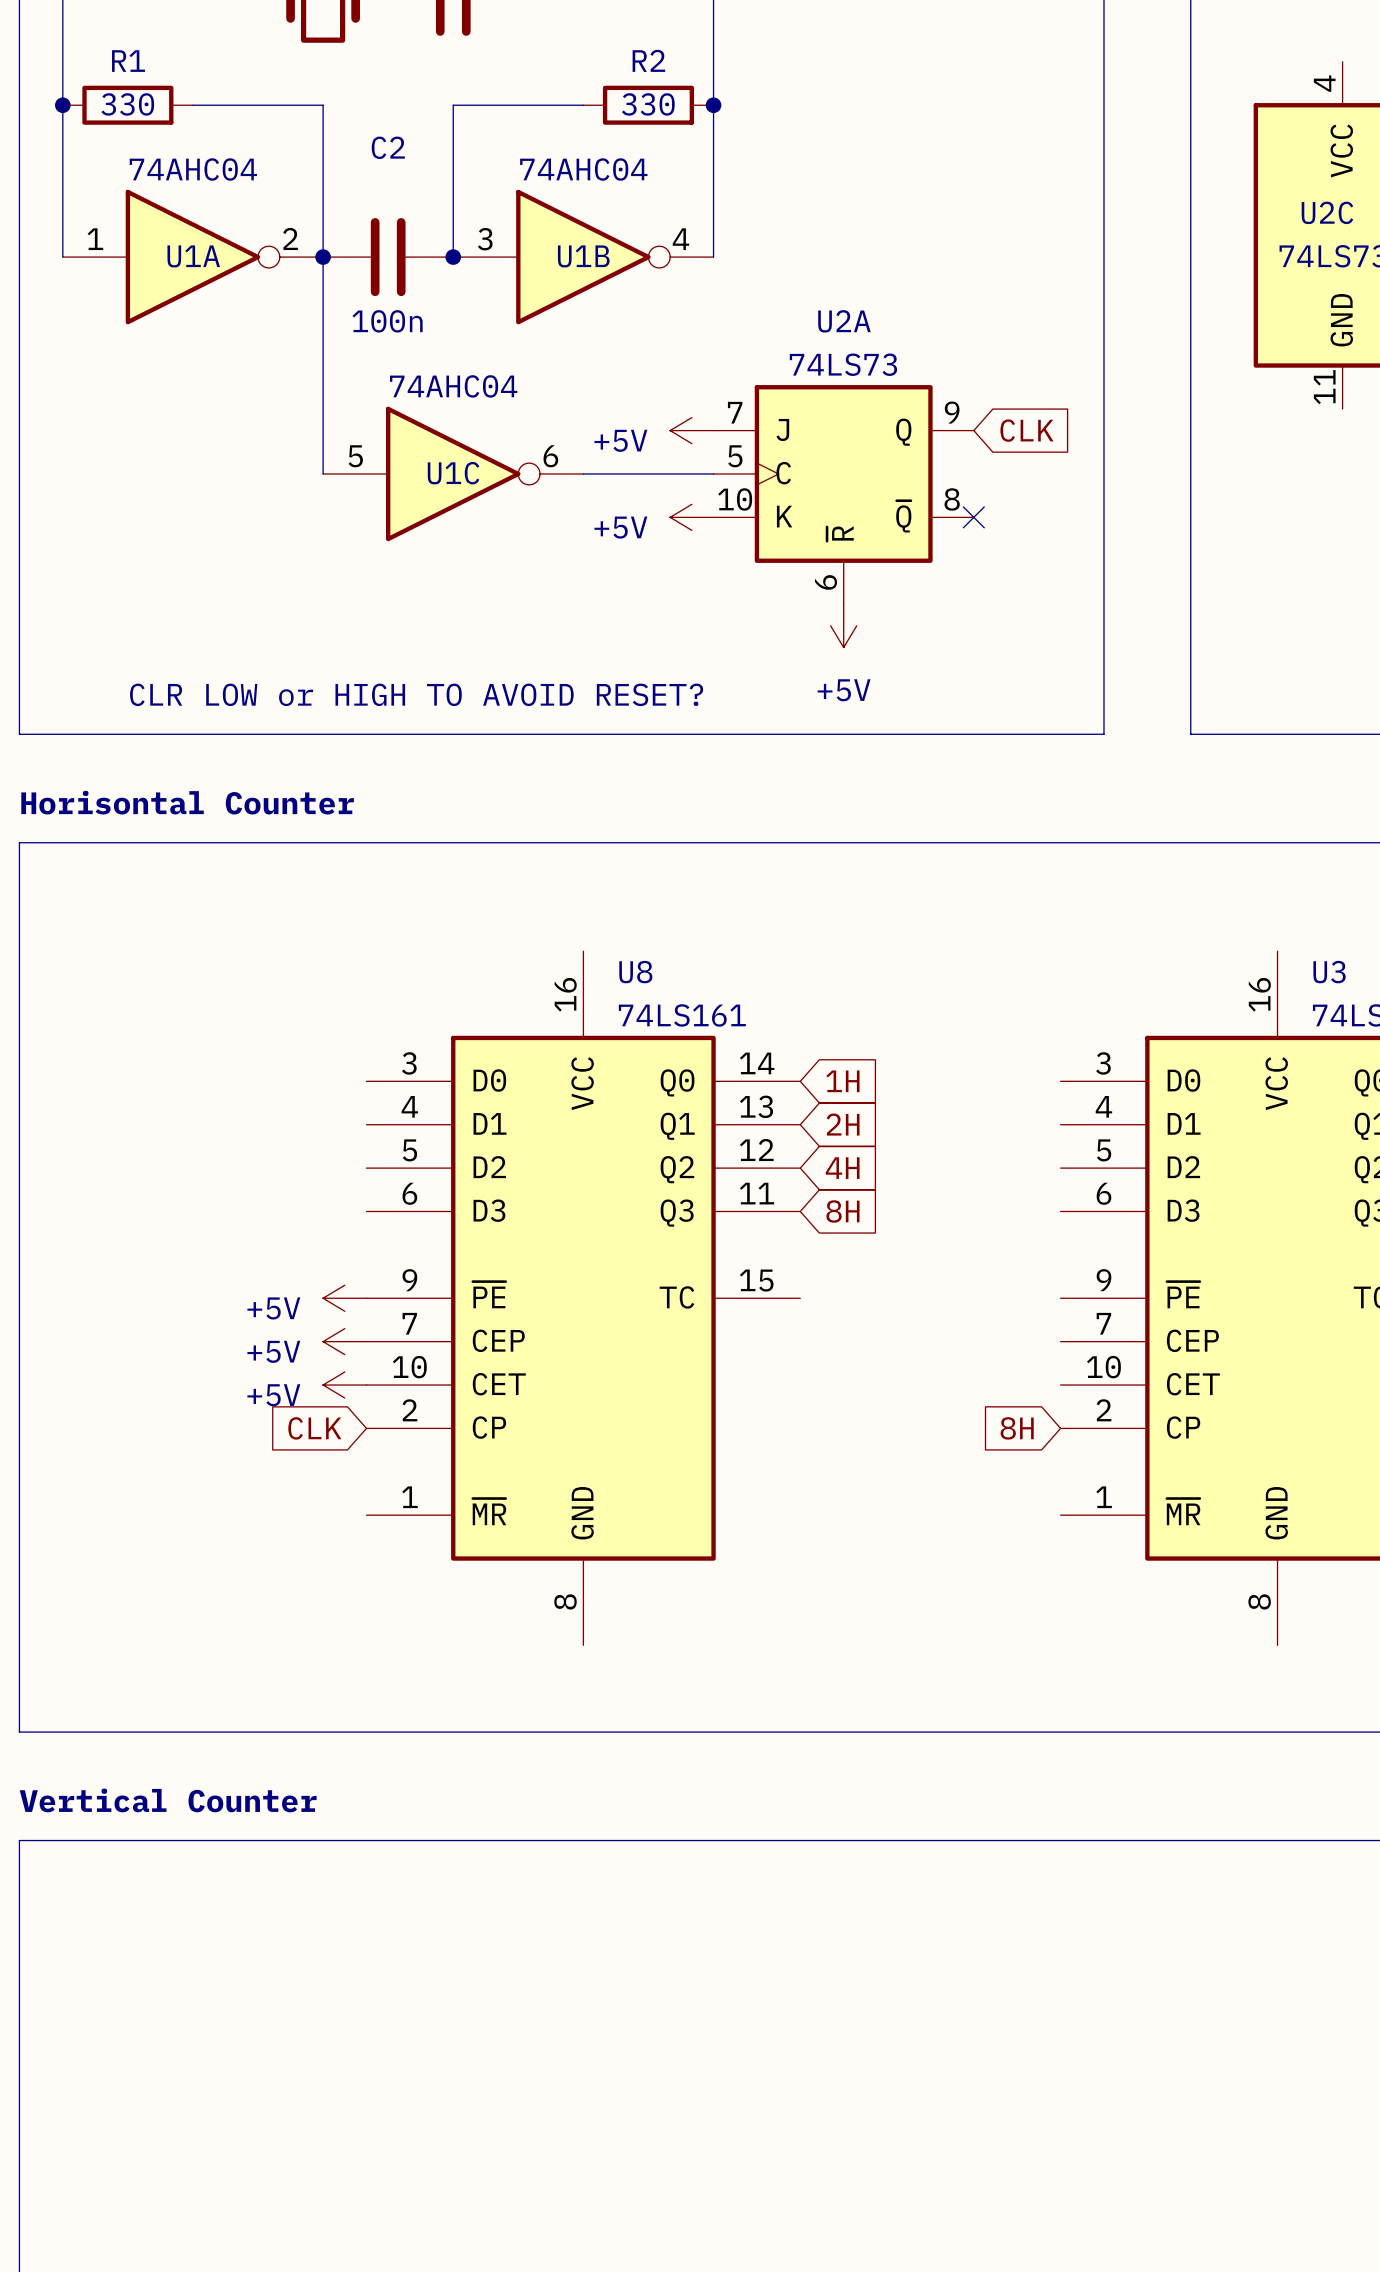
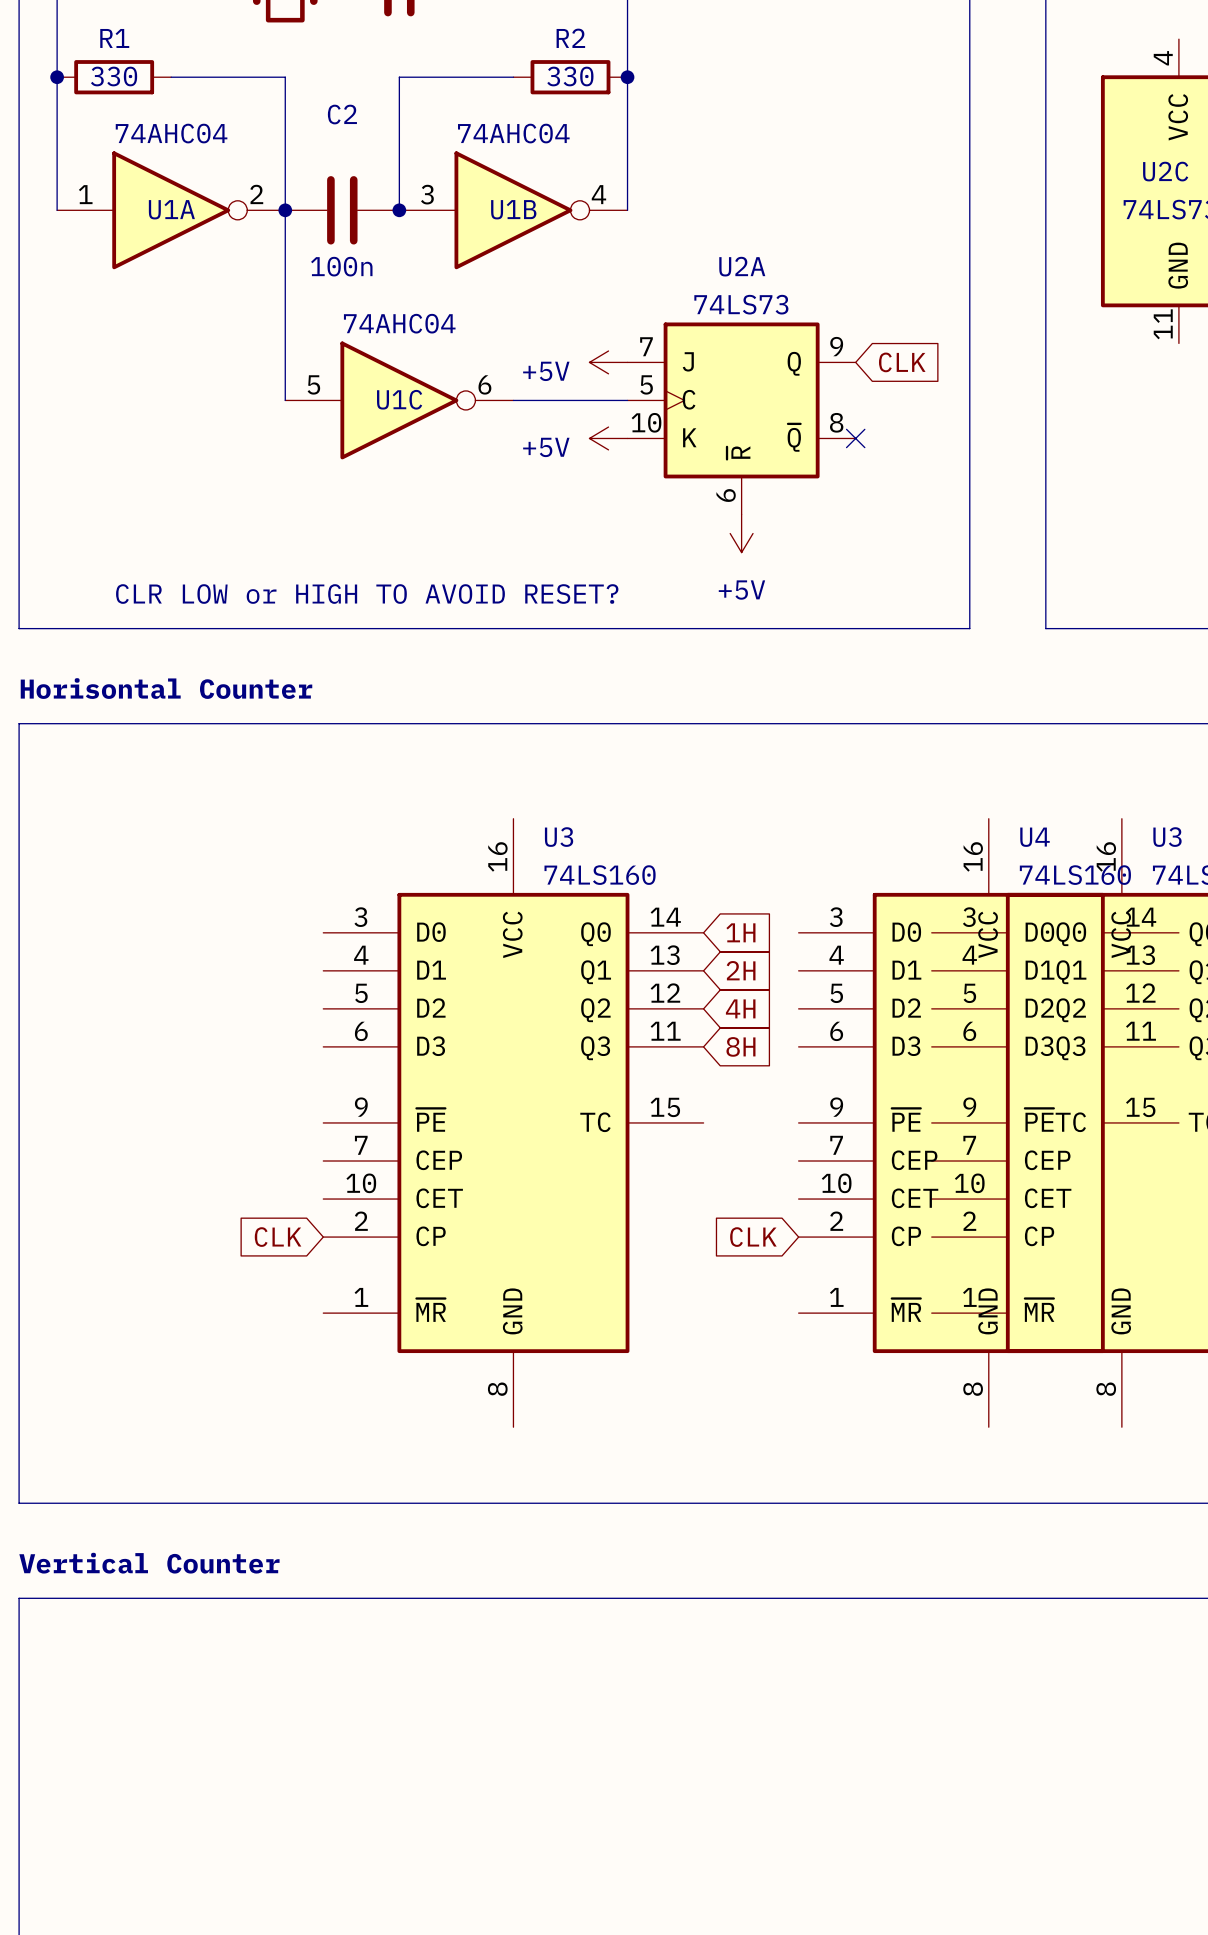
U8 name: U8 (635, 972) -> U3 (559, 837)
U8 value: 74LS161 (682, 1015) -> 74LS160 (600, 875)
power symbol: +5V (344, 1298) -> none
U4: none -> 74LS160 (988, 1122)
power symbol: +5V (344, 1341) -> none
power symbol: +5V (344, 1385) -> none
global label: none -> CLK (753, 1237)
global label: 8H (1017, 1428) -> none

